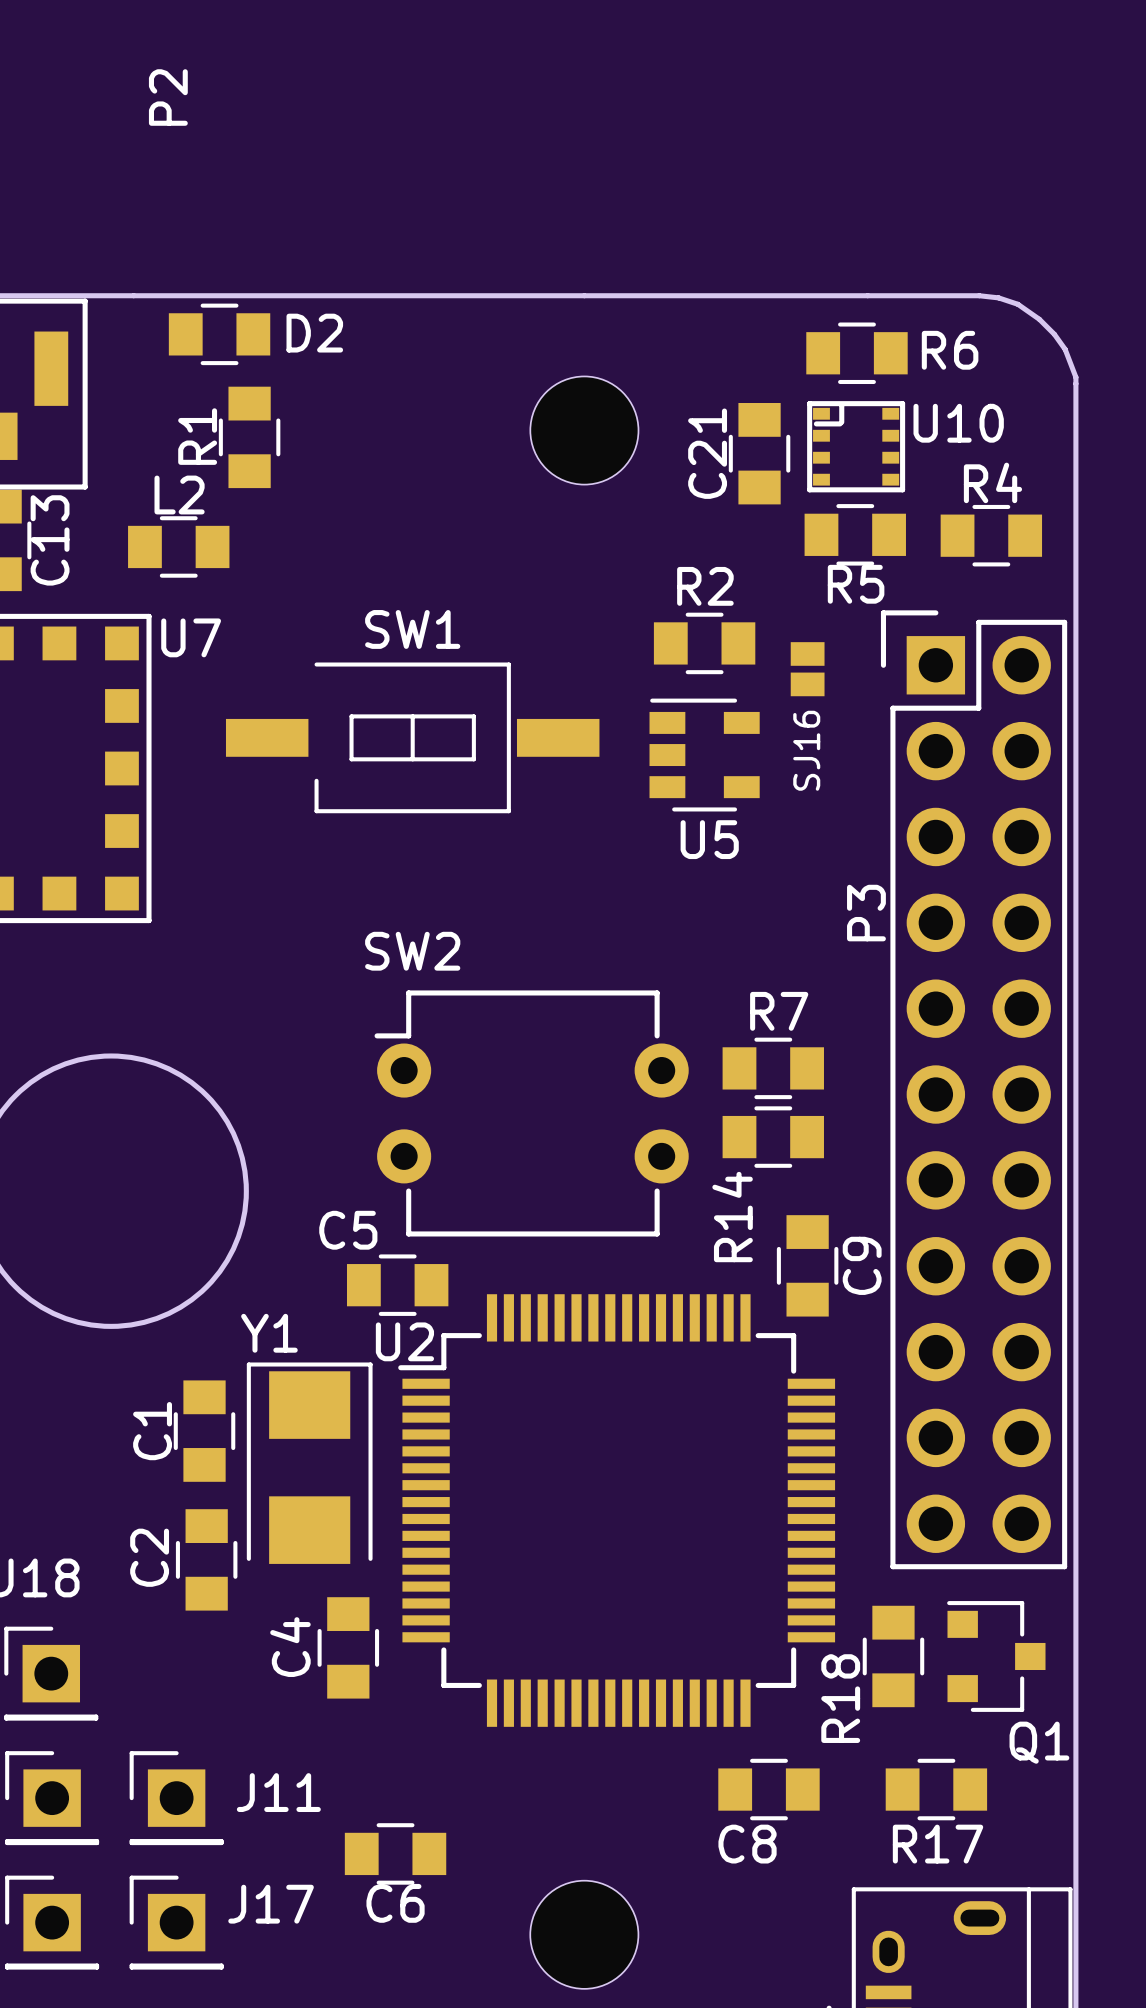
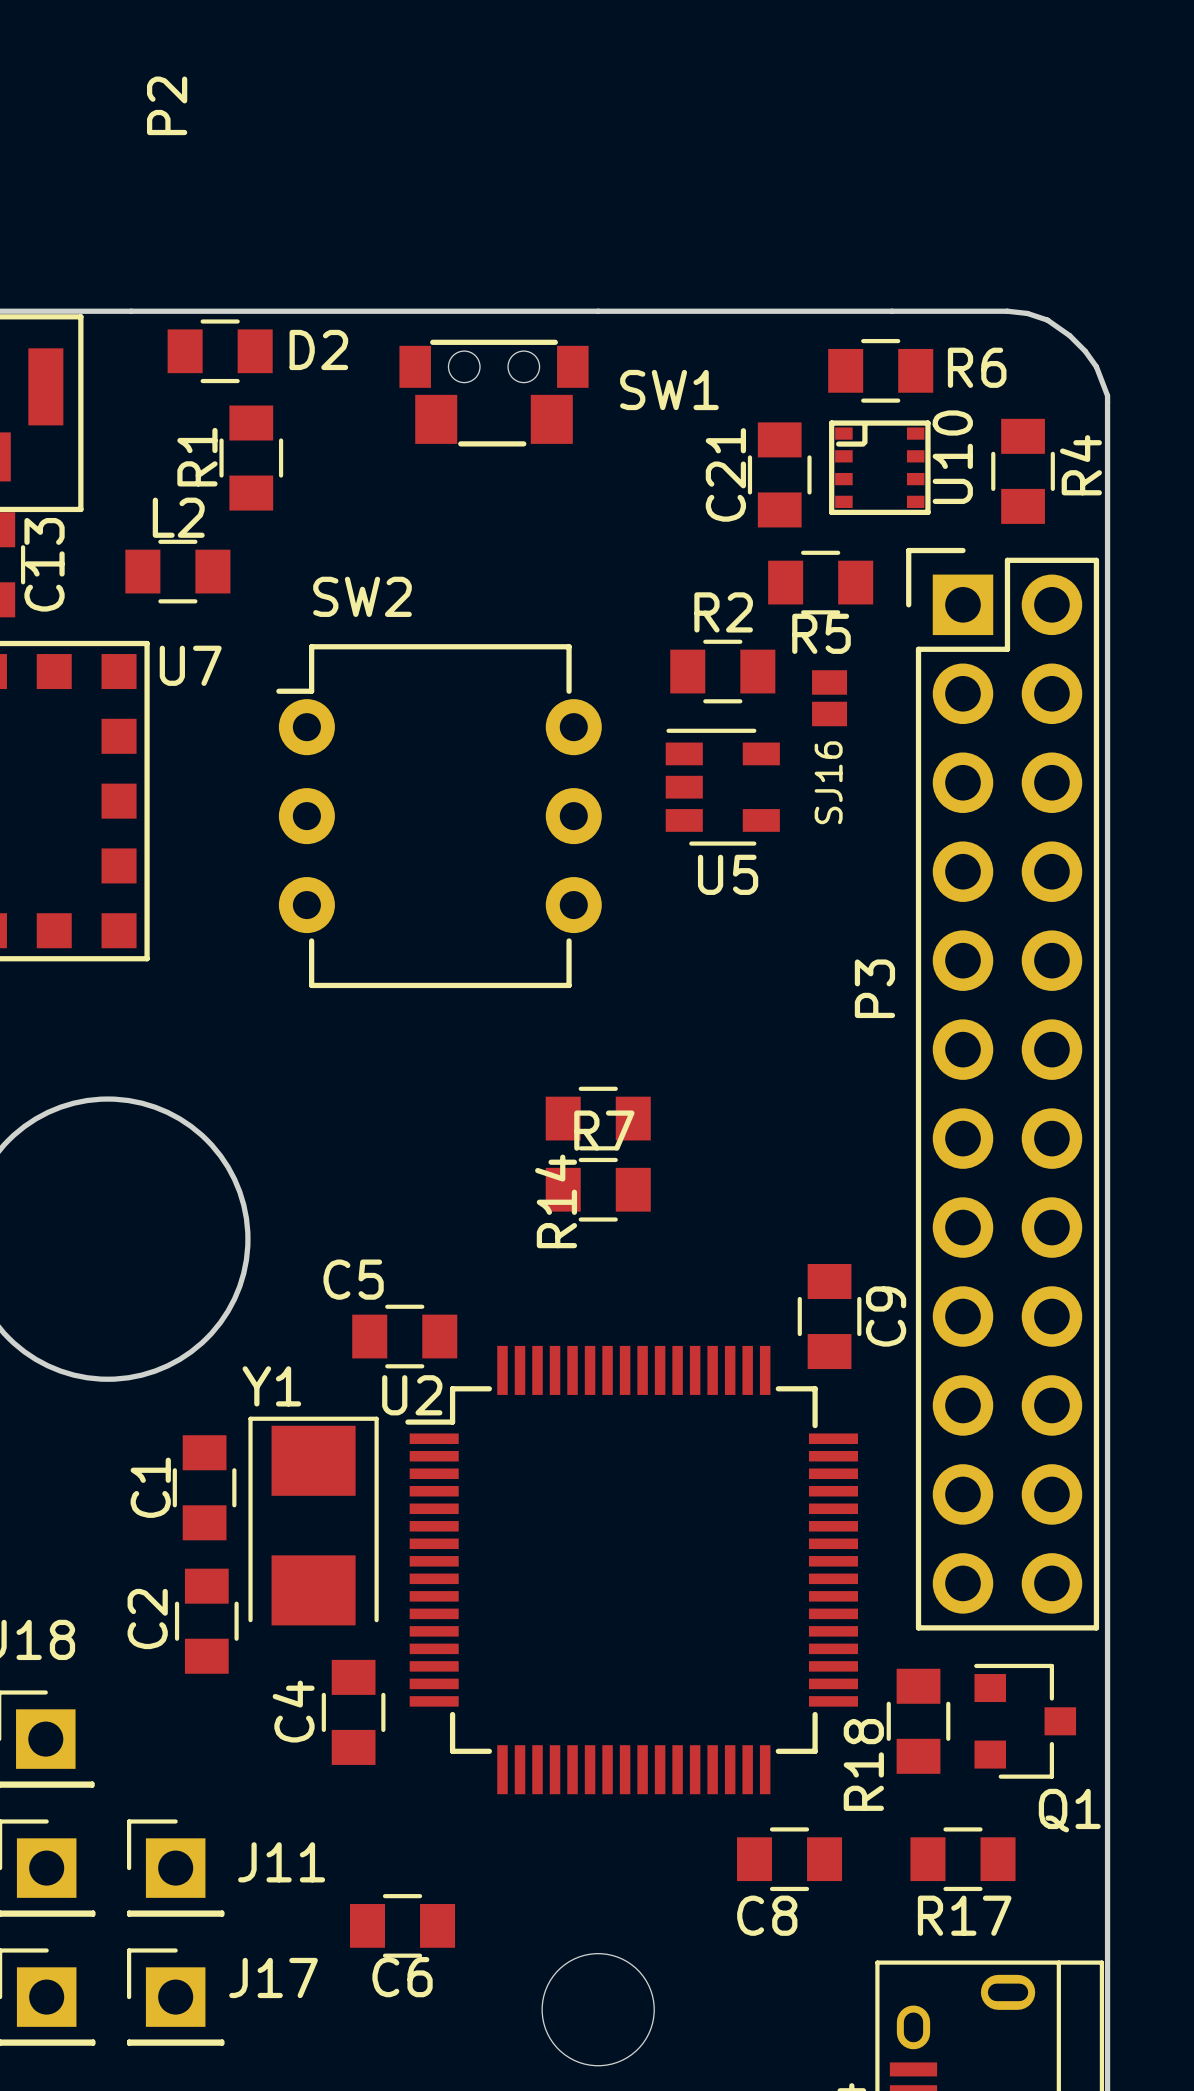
U10 name rotation: 0° (958, 423) -> 90° counterclockwise (952, 457)
part: (584, 430) -> none
R5 position: (855, 534) -> (820, 582)
R4 rotation: 0° (991, 535) -> 90° clockwise (1023, 471)
R4 position: (991, 535) -> (1023, 471)
P3 footprint: [880, 610, 1068, 1570] -> [906, 547, 1100, 1631]
SW1 name position: SW1 (412, 629) -> SW1 (669, 390)
SW1 footprint: [225, 662, 600, 814] -> [399, 339, 589, 447]
P3 name position: P3 (866, 913) -> P3 (874, 988)
SW2 footprint: [374, 990, 689, 1237] -> [276, 644, 602, 989]
R7 position: (773, 1068) -> (598, 1189)
R14 position: (773, 1137) -> (598, 1118)

